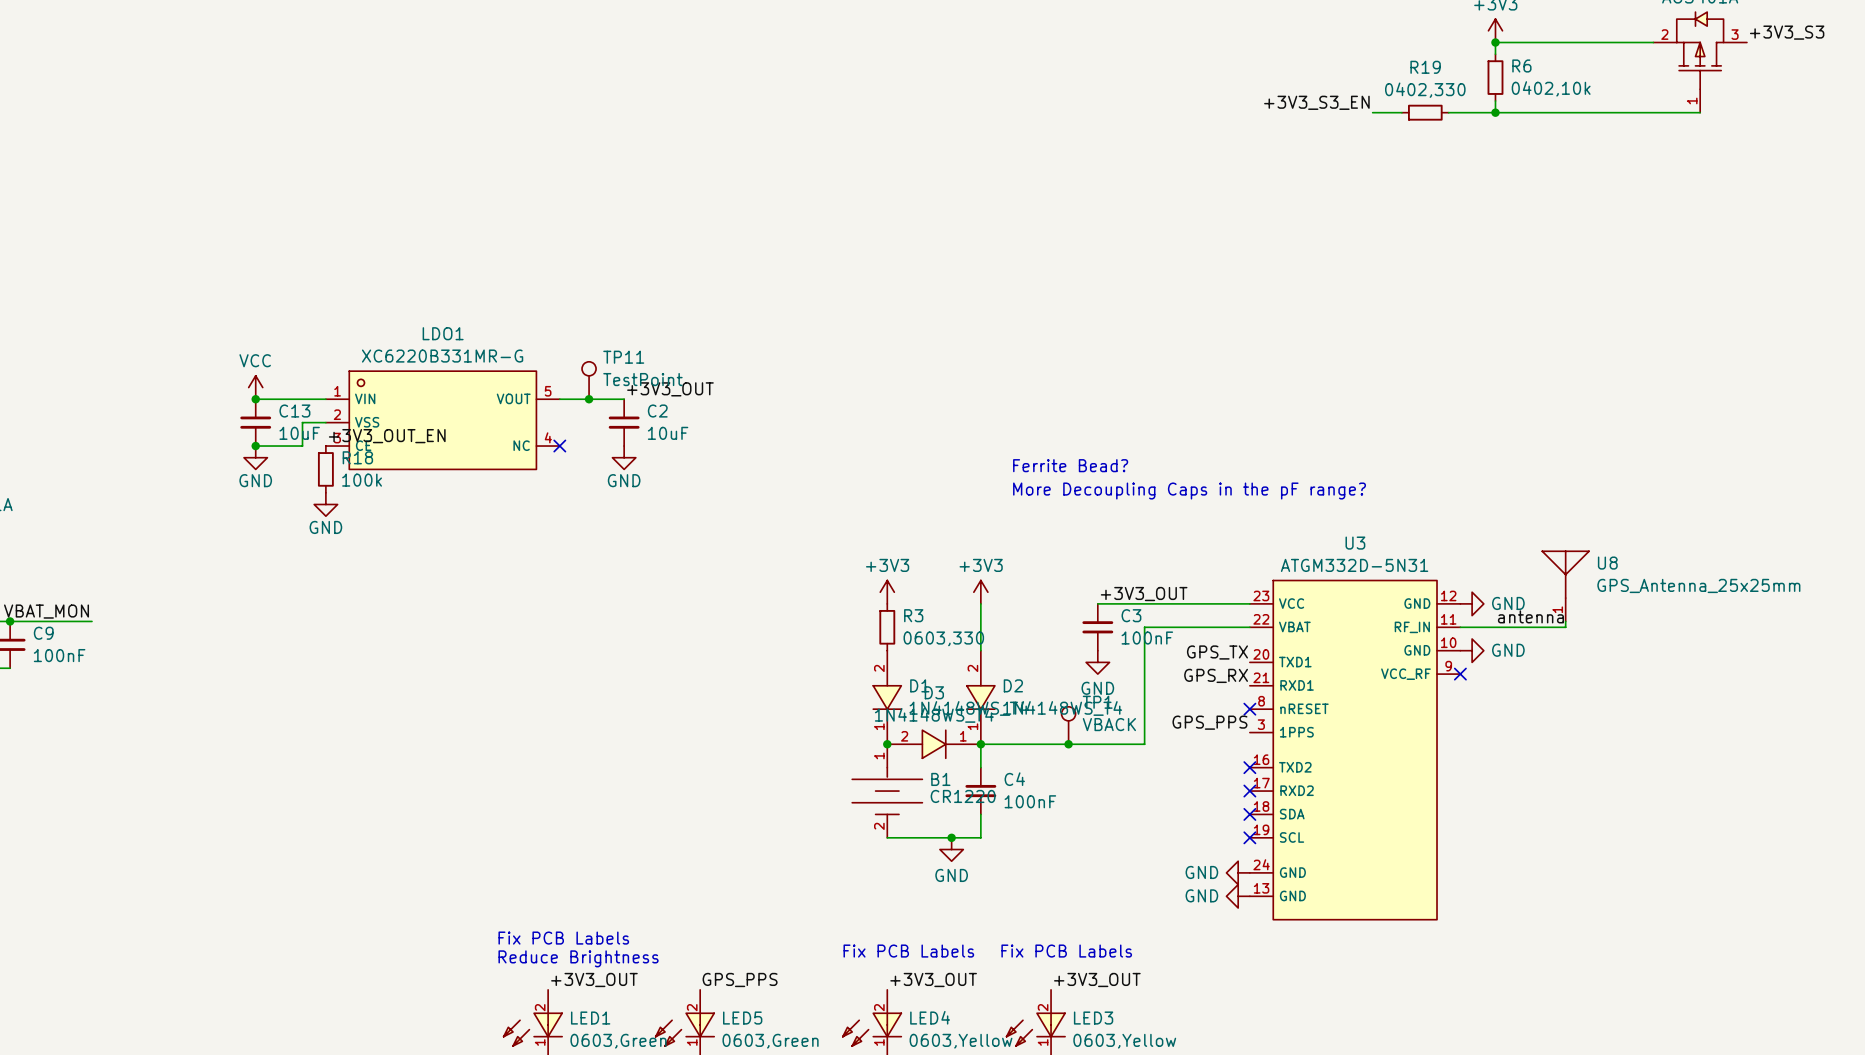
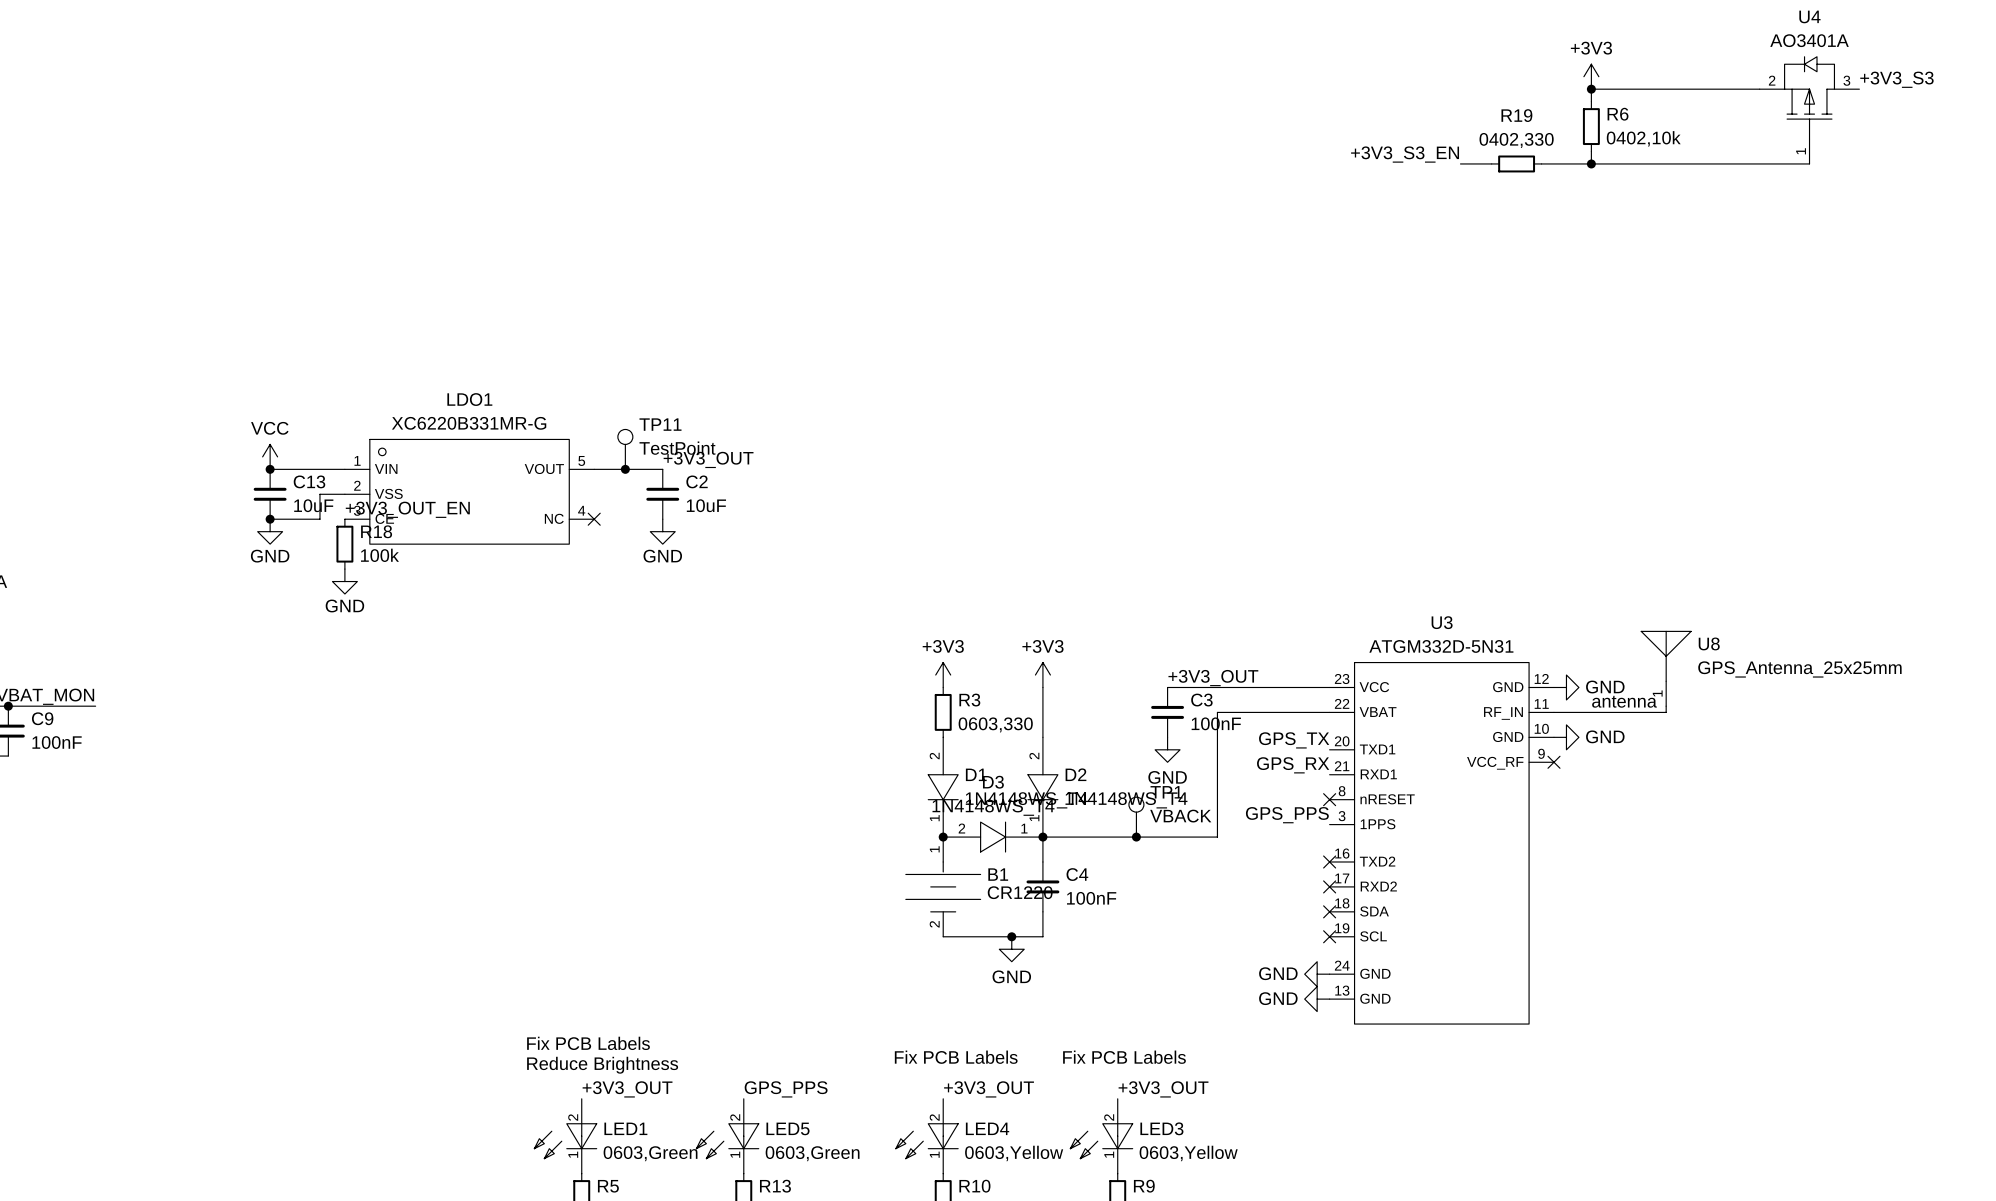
text: Ferrite Bead? (1070, 465) -> none
text: More Decoupling Caps in the pF range? (1189, 491) -> none

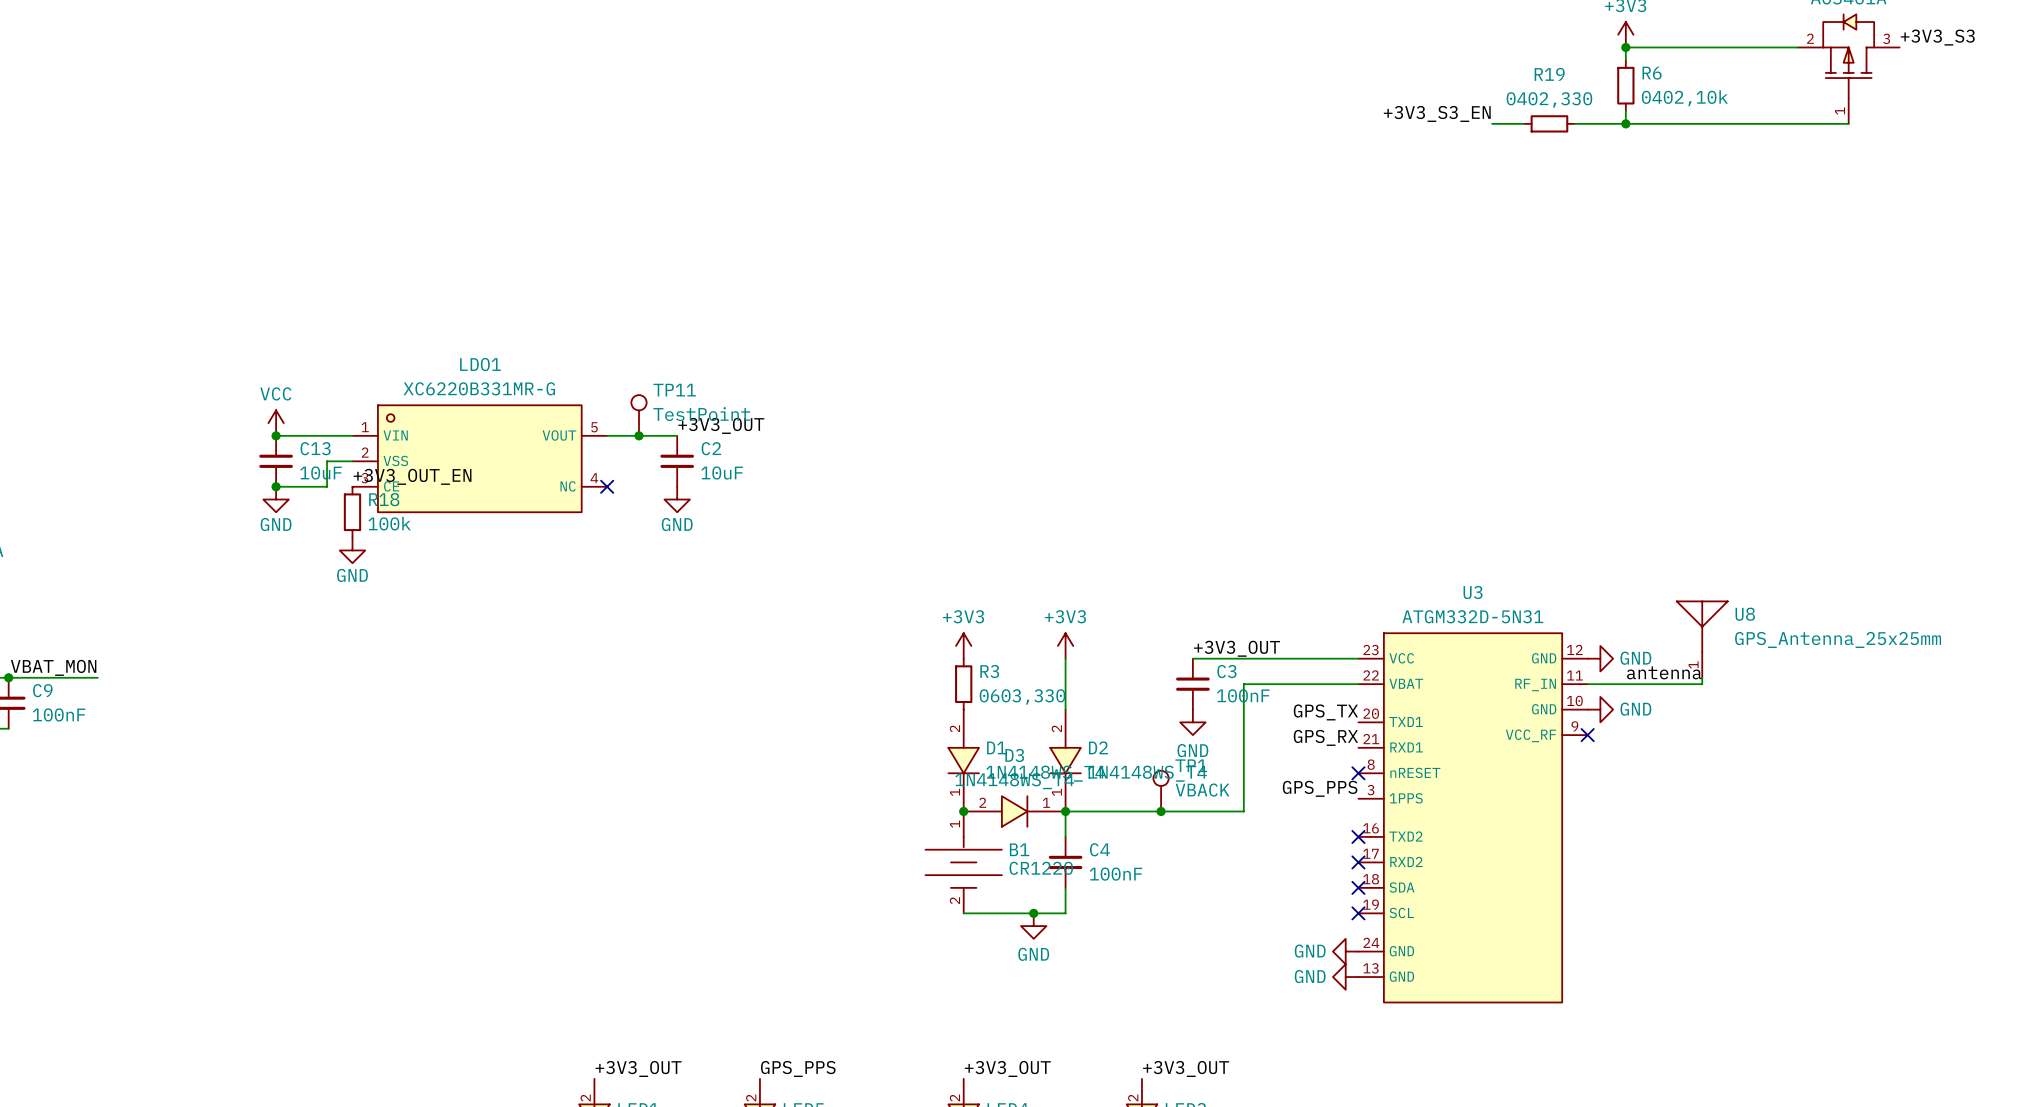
text: Fix PCB Labels (588, 1043) -> none
text: Fix PCB Labels (956, 1057) -> none
text: Fix PCB Labels (1124, 1057) -> none
text: Reduce Brightness (602, 1065) -> none

